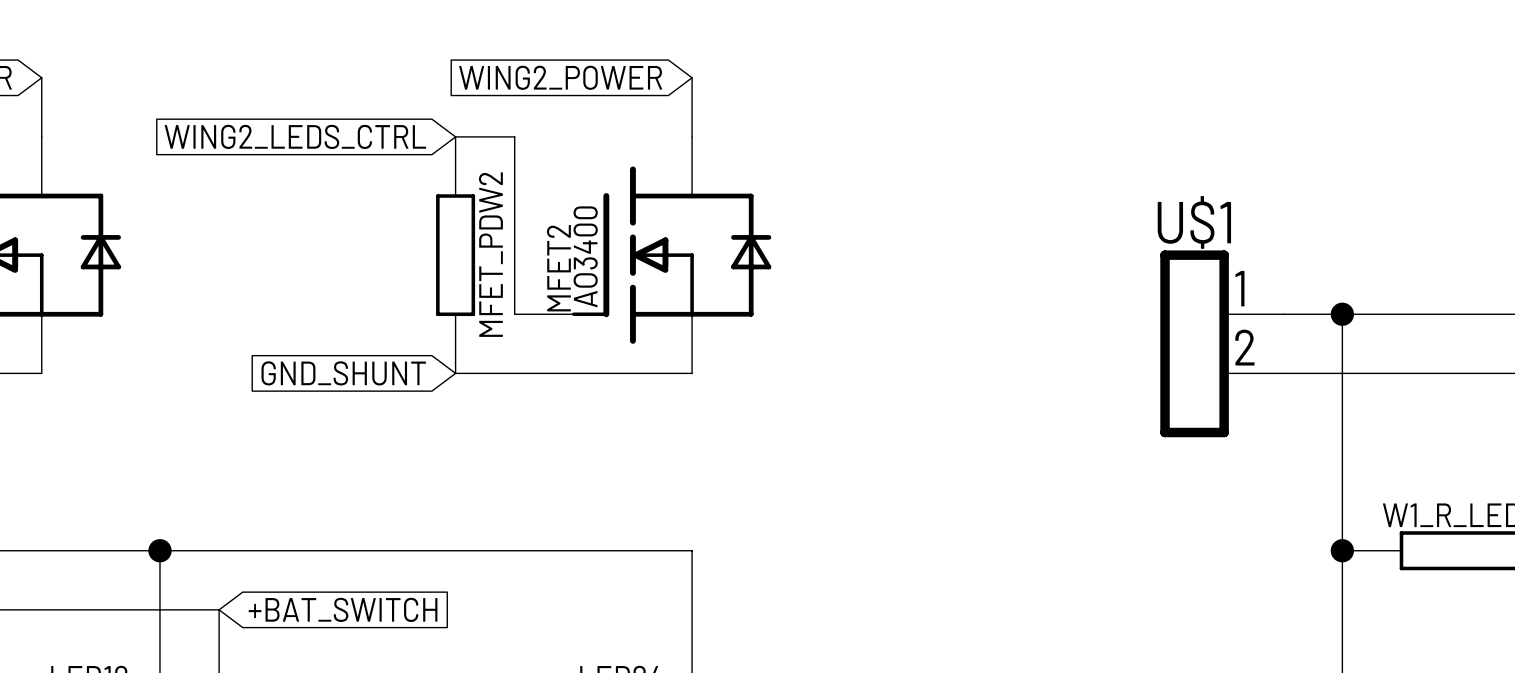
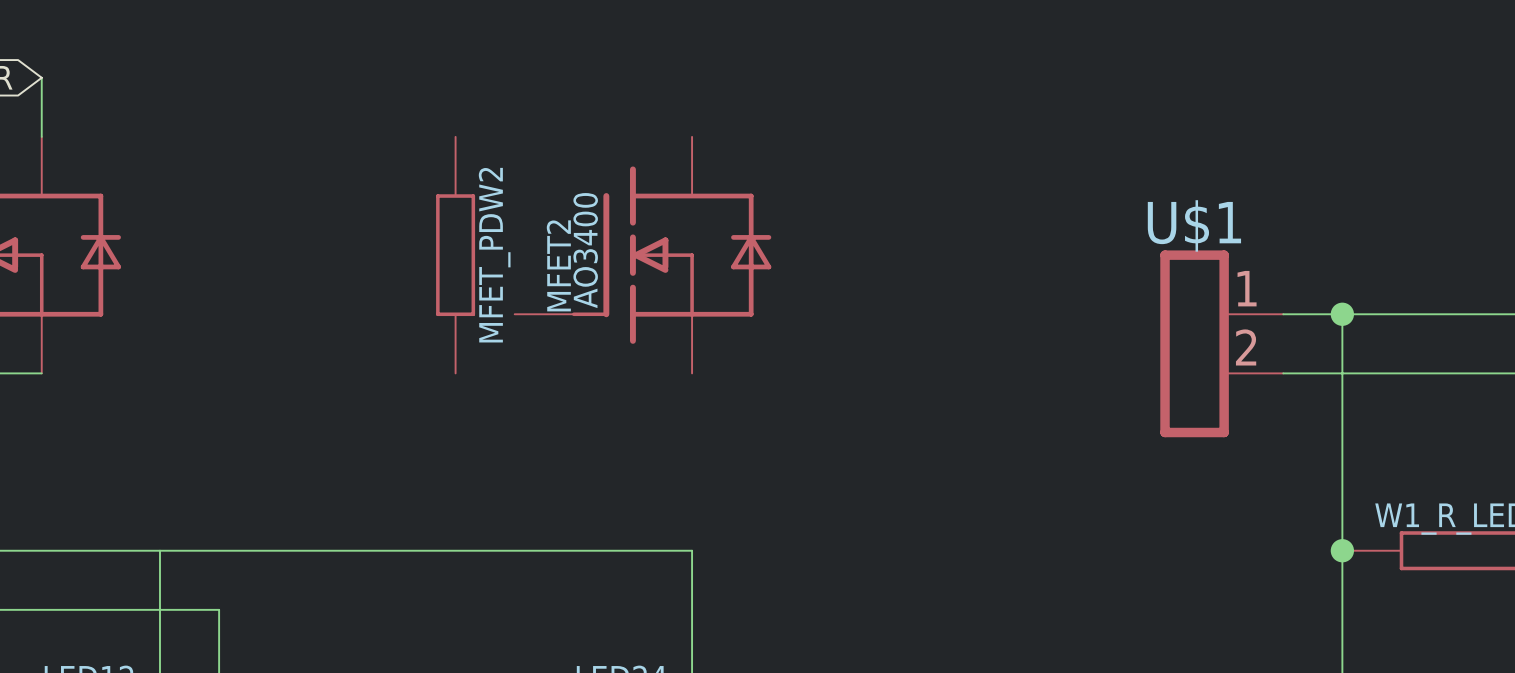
global label: WING2_POWER (560, 77) -> none
wire: (692, 77) (692, 136) -> none
global label: WING2_LEDS_CTRL (295, 136) -> none
wire: (455, 136) (514, 136) (514, 314) -> none
global label: GND_SHUNT (343, 373) -> none
wire: (455, 373) (692, 373) -> none
junction: (159, 550) -> none
global label: +BAT_SWITCH (343, 609) -> none

